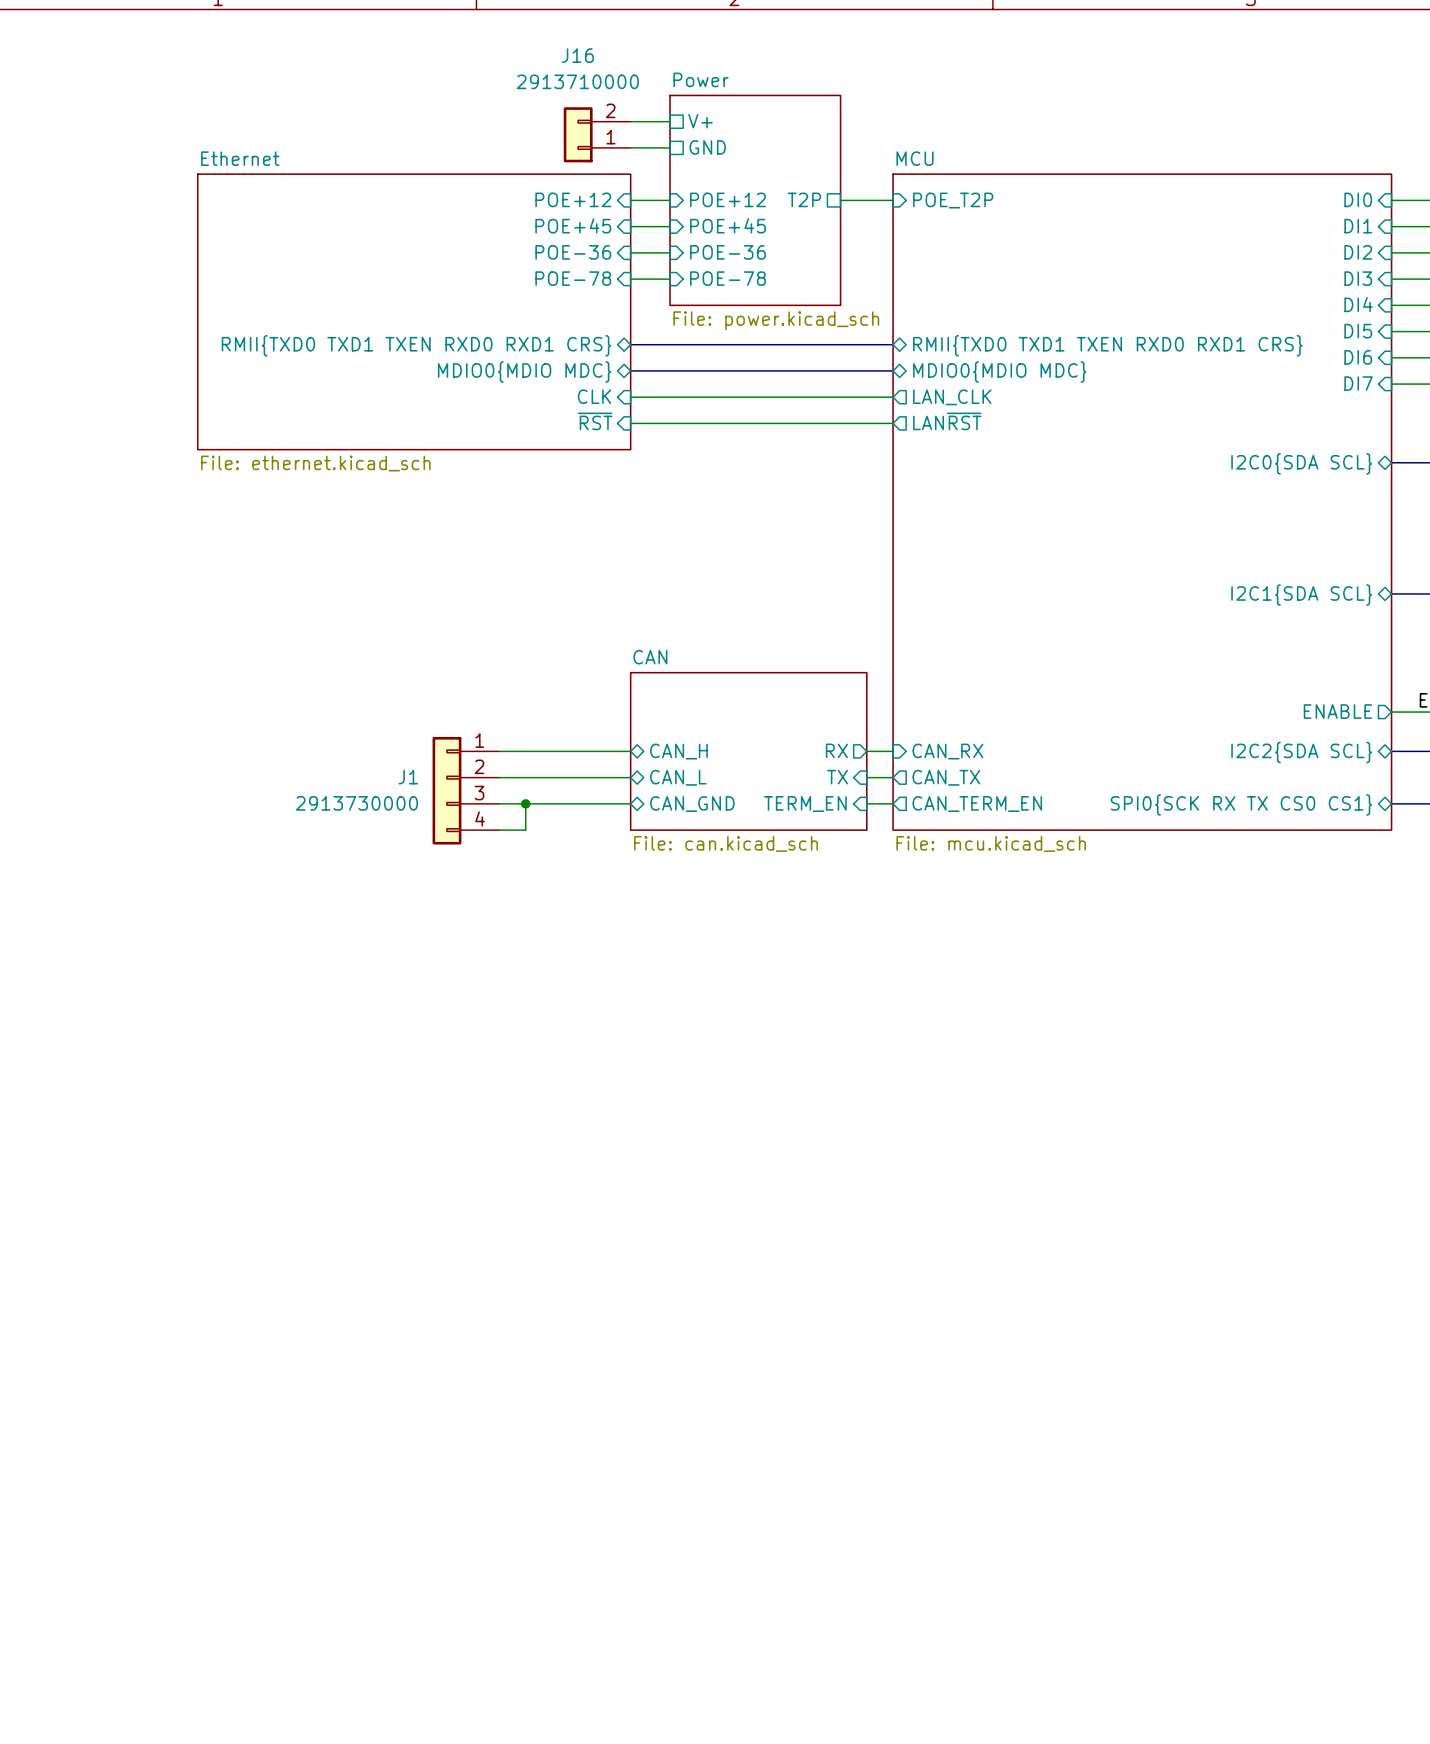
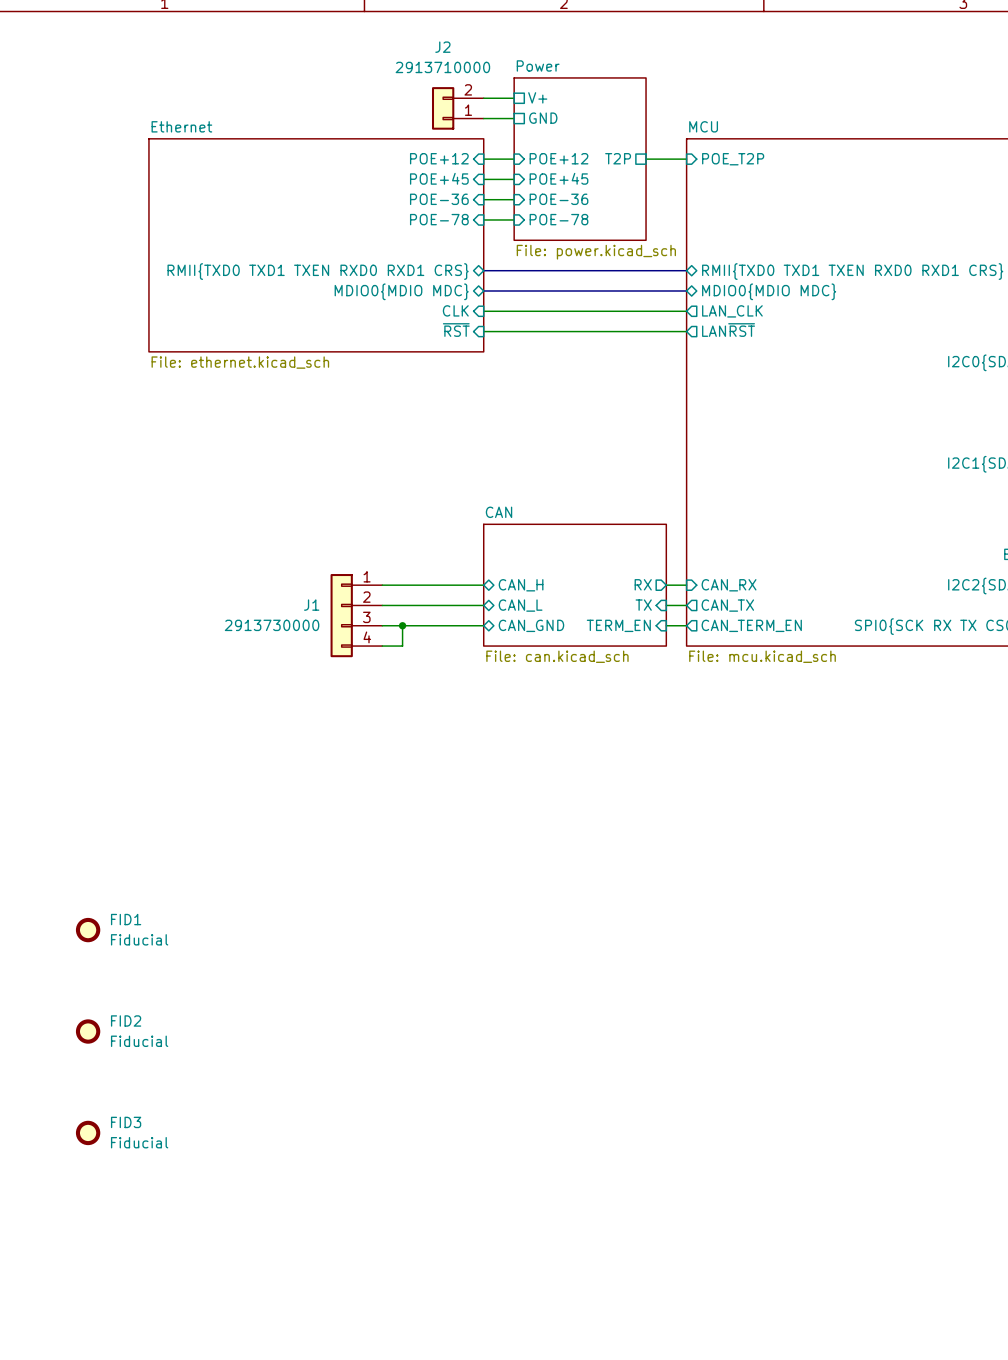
J16 name: J16 (577, 55) -> J2 (442, 47)
FID1: none -> Fiducial (88, 930)
FID2: none -> Fiducial (88, 1031)
FID3: none -> Fiducial (88, 1132)

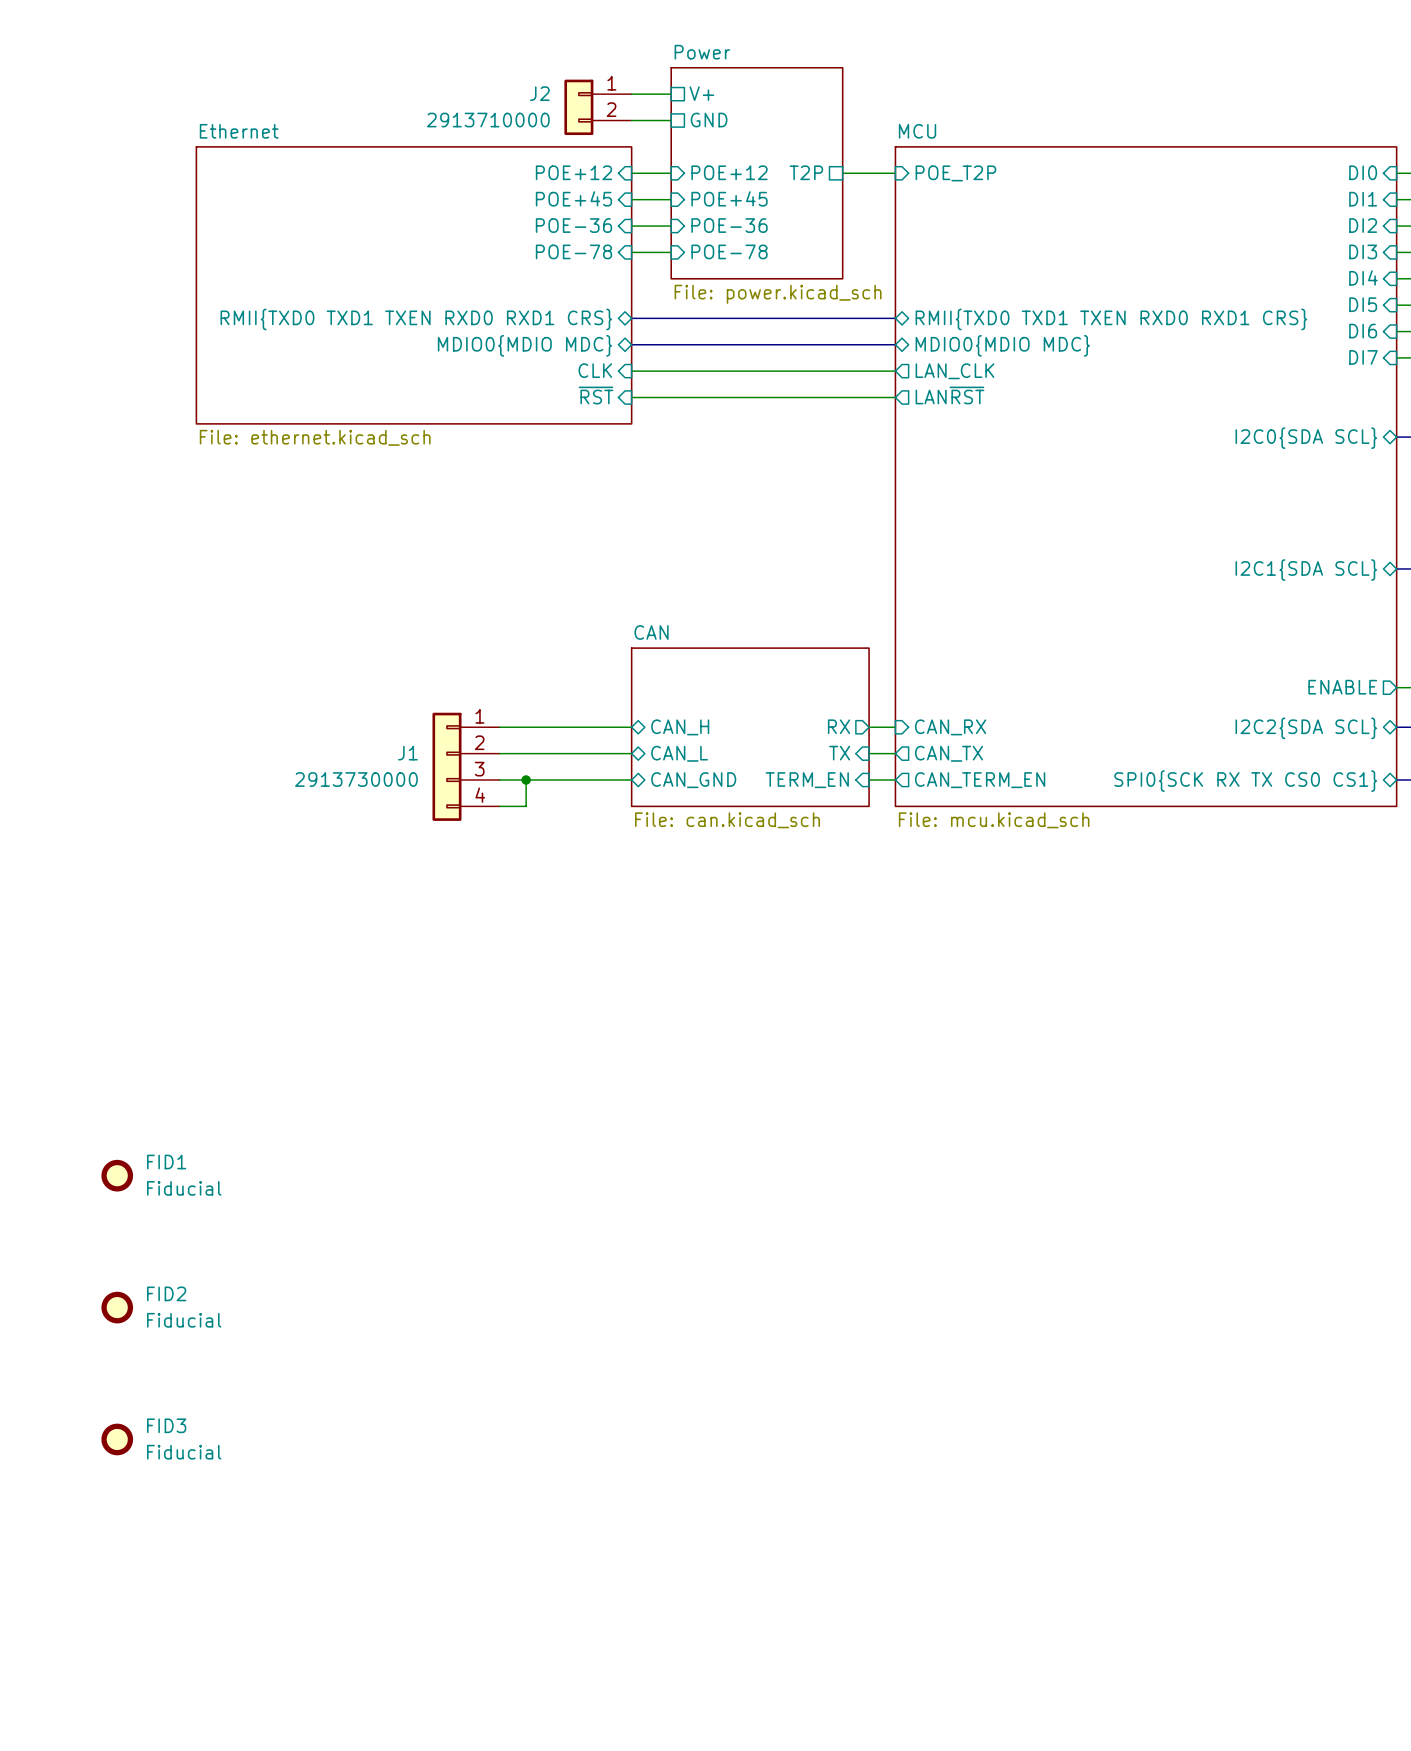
J2 name position: J2 (442, 47) -> J2 (539, 93)
J2 value position: 2913710000 (442, 67) -> 2913710000 (488, 120)
J2 flip: as is (443, 108) -> up-down (578, 107)

